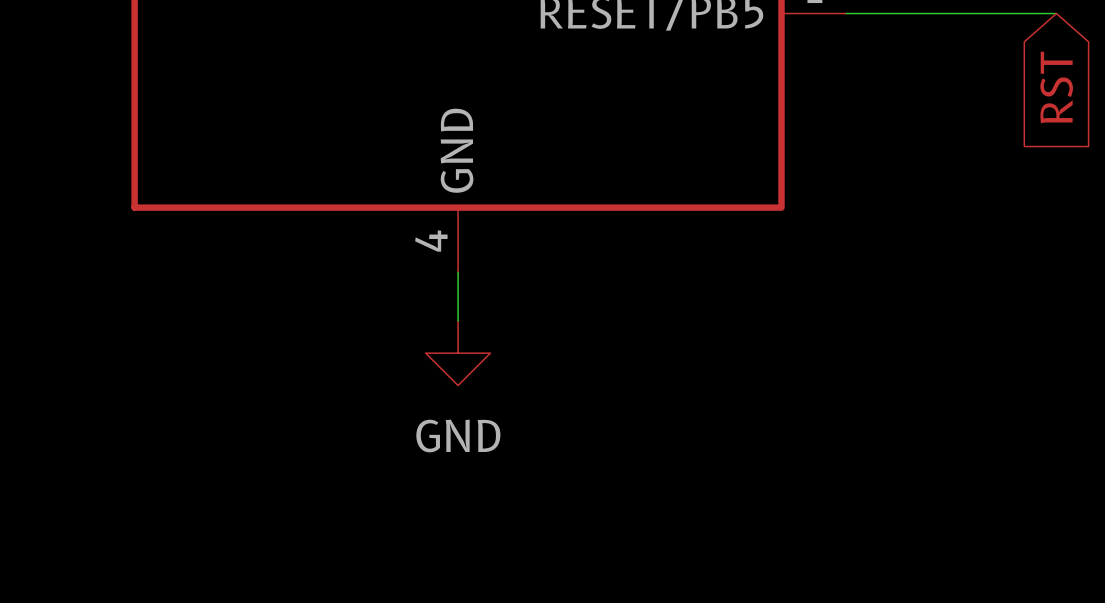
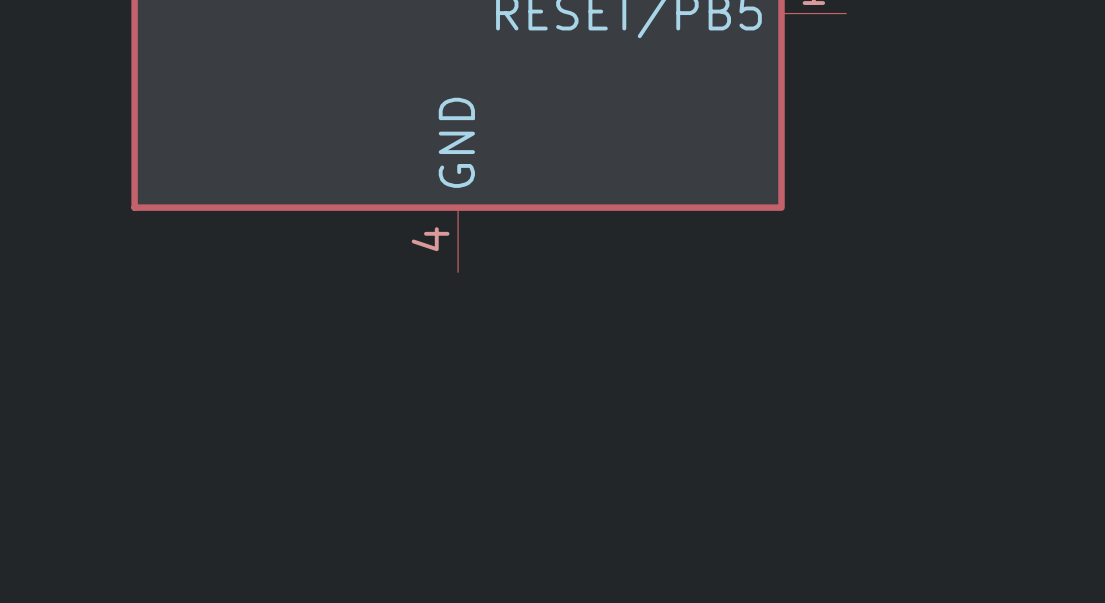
wire: (846, 13) (1056, 13) -> none
global label: RST (1056, 87) -> none
wire: (458, 272) (458, 320) -> none
power symbol: GND (458, 353) -> none

